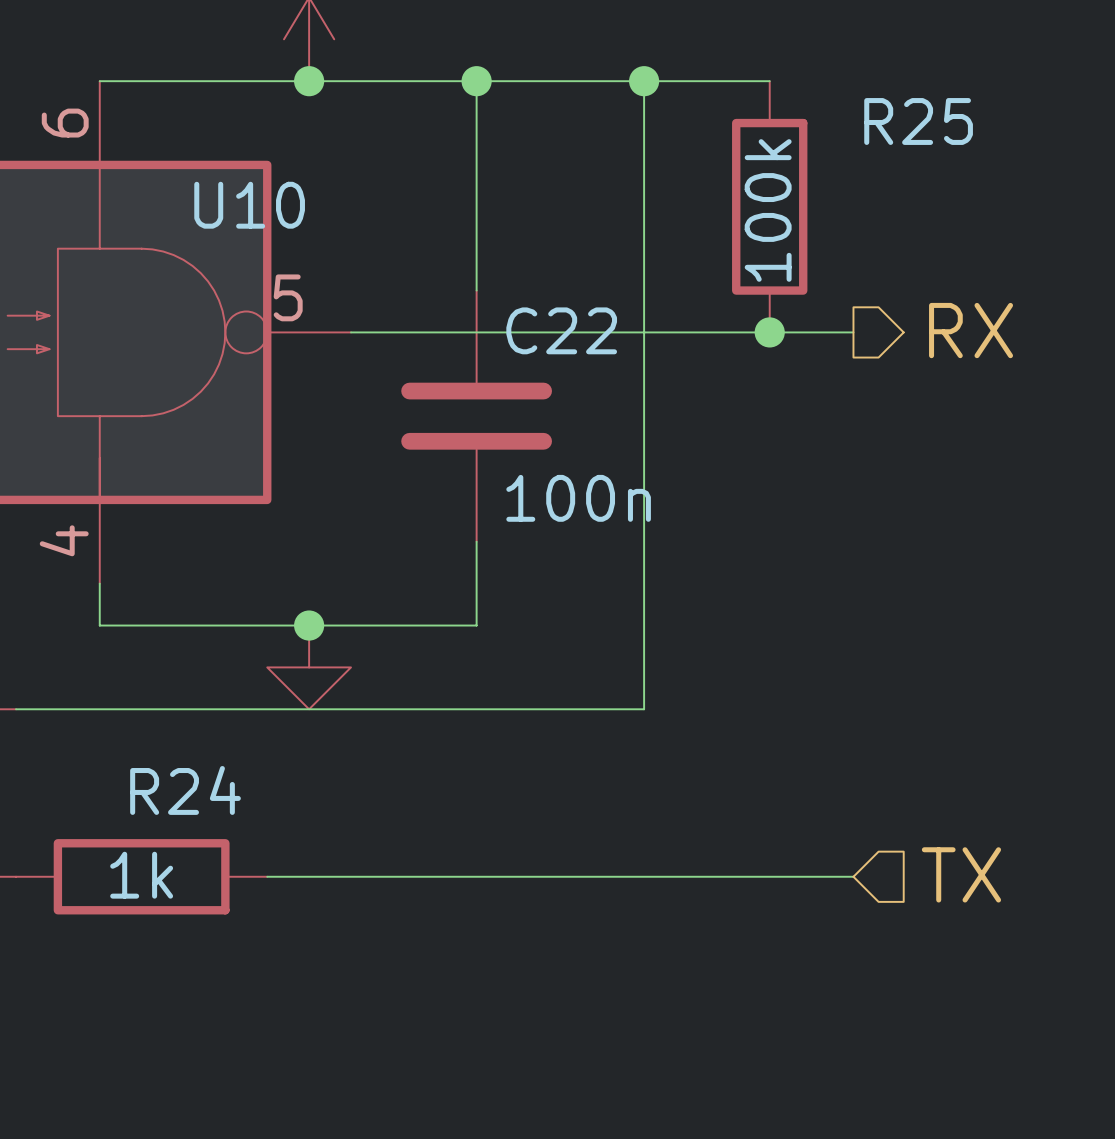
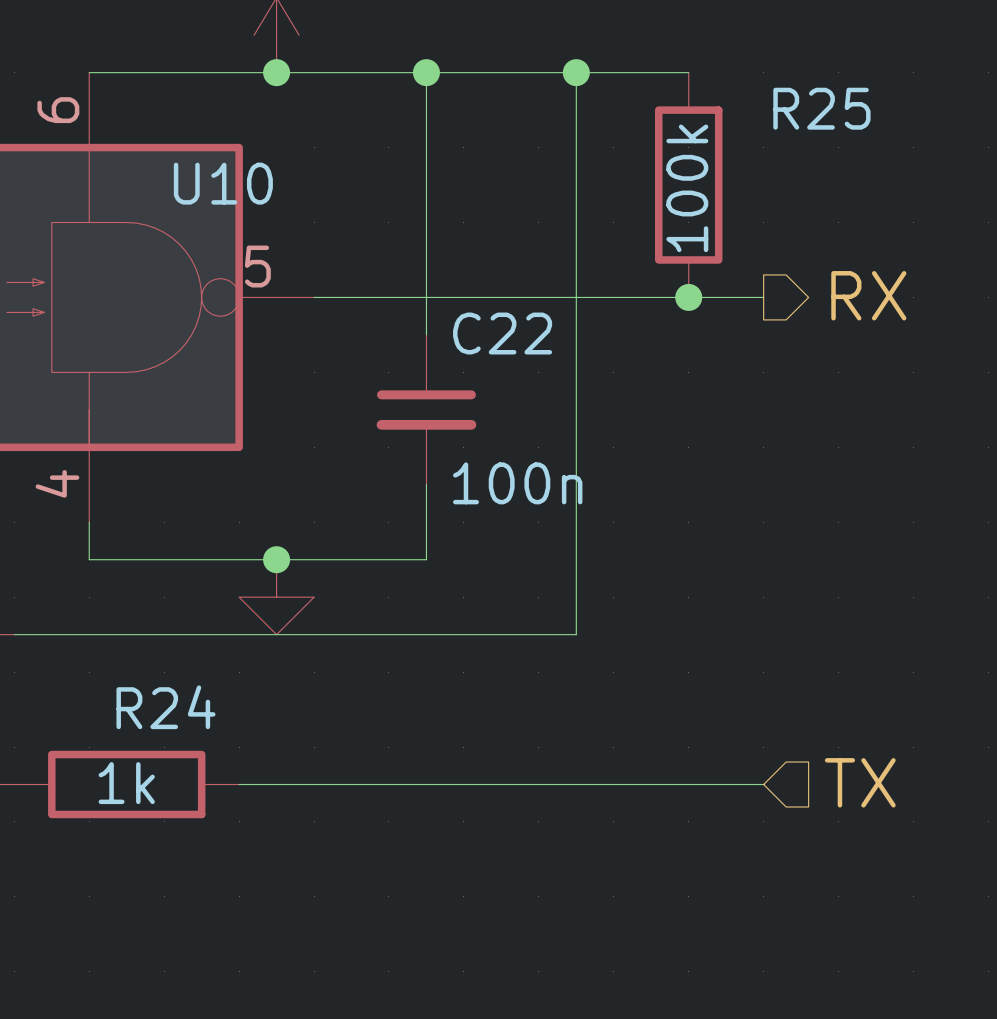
C22 symbol: [401, 290, 552, 542] -> [376, 334, 477, 485]

